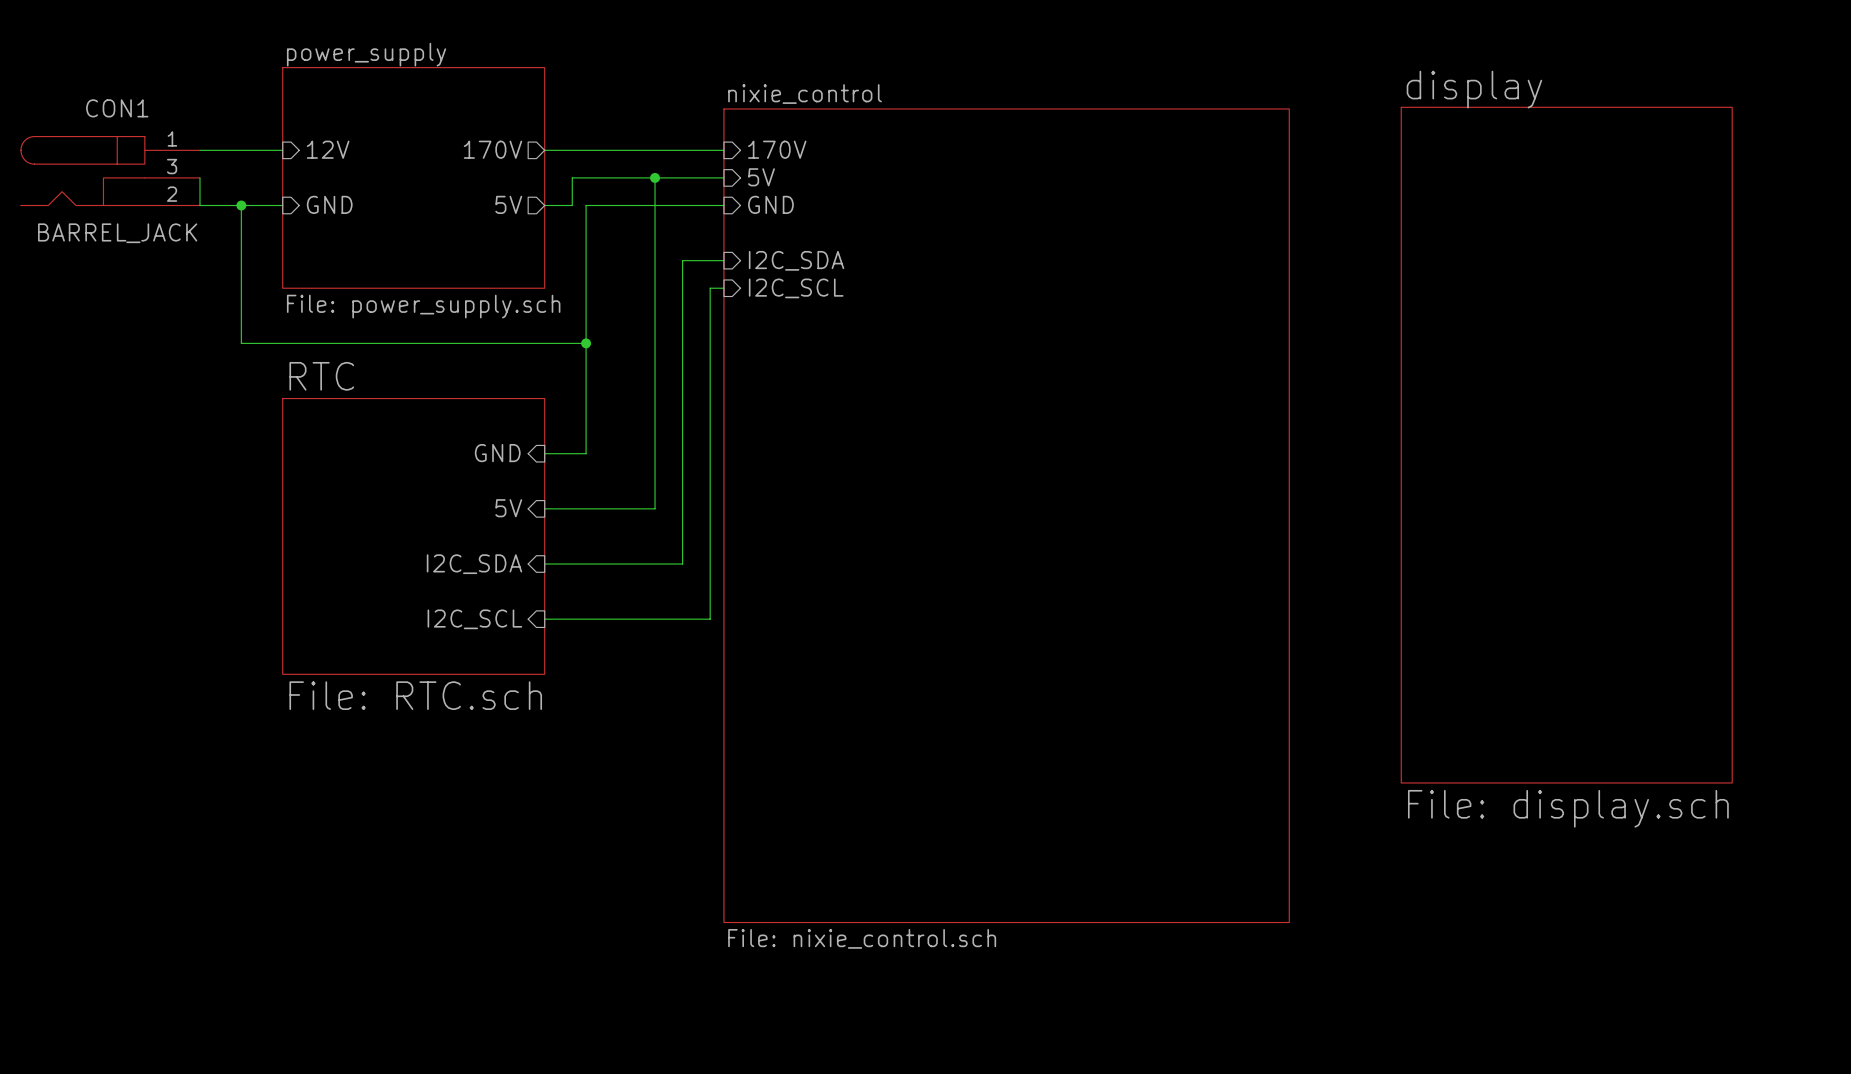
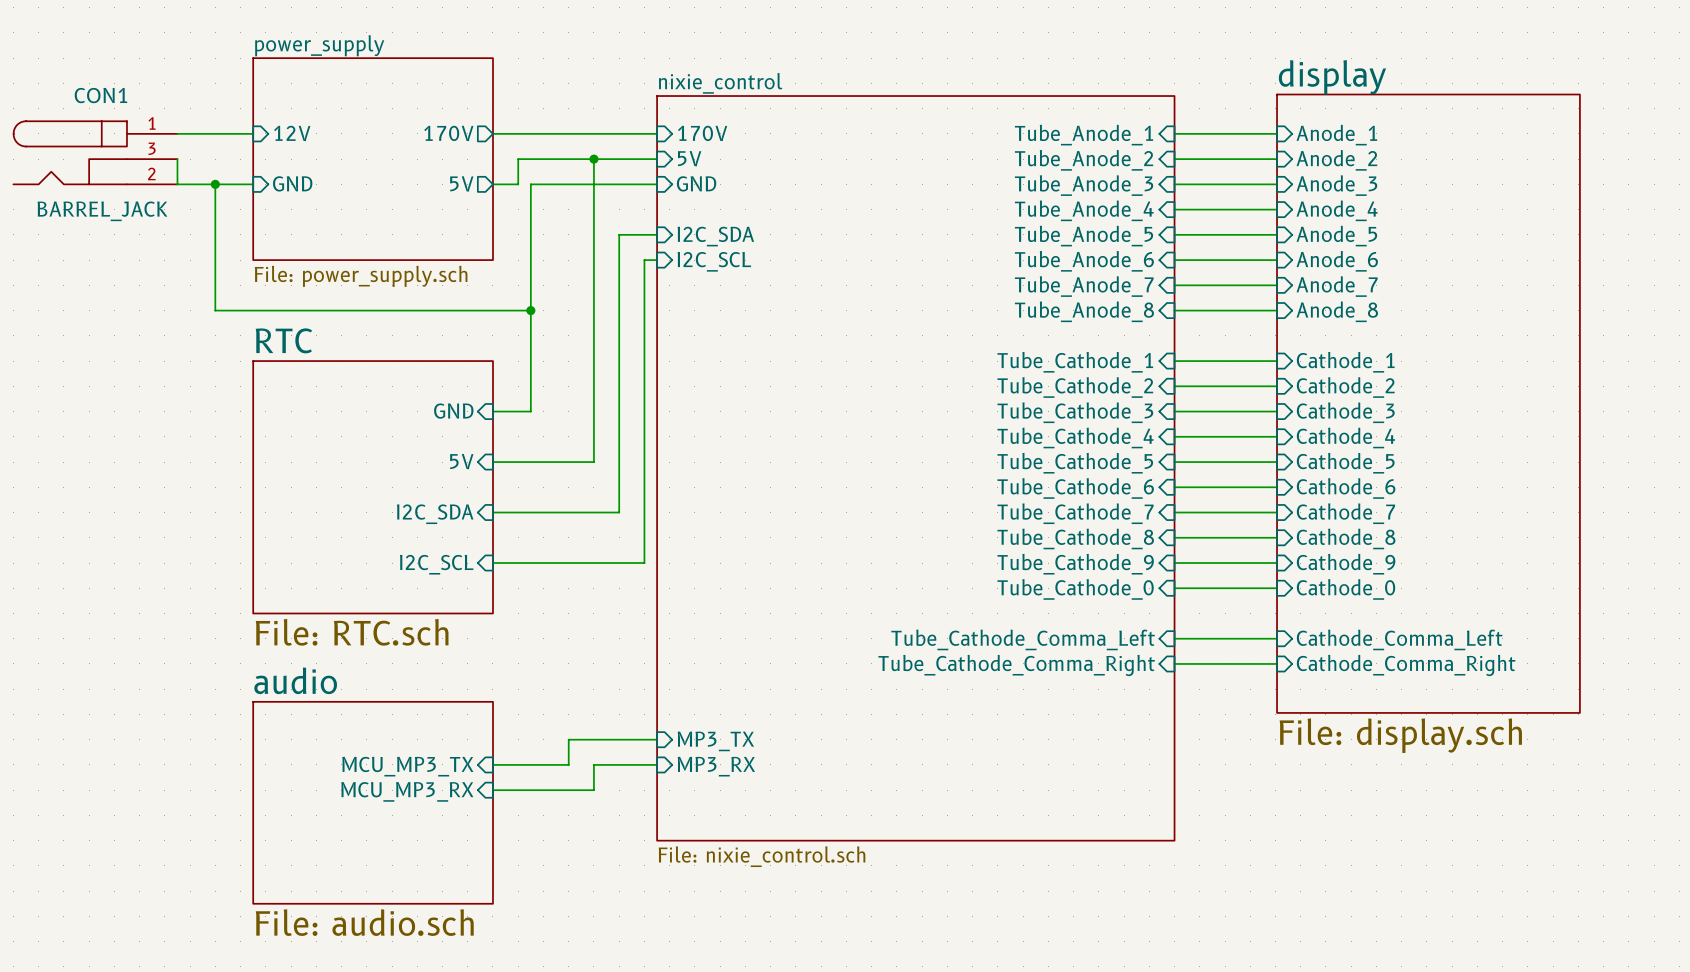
sheet pin: none -> Tube_Anode_1 (1084, 135)
wire: none -> (1174, 133) (1275, 133)
sheet pin: none -> Anode_1 (1336, 135)
wire: none -> (1174, 159) (1275, 159)
sheet pin: none -> Tube_Anode_2 (1084, 160)
sheet pin: none -> Anode_2 (1336, 160)
sheet pin: none -> Tube_Anode_3 (1084, 185)
wire: none -> (1174, 184) (1275, 184)
sheet pin: none -> Anode_3 (1336, 185)
sheet pin: none -> Tube_Anode_4 (1084, 210)
sheet pin: none -> Anode_4 (1337, 210)
wire: none -> (1174, 209) (1275, 209)
sheet pin: none -> Tube_Anode_5 (1084, 236)
wire: none -> (1174, 234) (1275, 234)
sheet pin: none -> Anode_5 (1336, 236)
sheet pin: none -> Tube_Anode_6 (1084, 261)
wire: none -> (1174, 260) (1275, 260)
sheet pin: none -> Anode_6 (1337, 261)
sheet pin: none -> Tube_Anode_7 (1084, 286)
wire: none -> (1174, 285) (1275, 285)
sheet pin: none -> Anode_7 (1337, 286)
sheet pin: none -> Tube_Anode_8 (1084, 311)
wire: none -> (1174, 310) (1275, 310)
sheet pin: none -> Anode_8 (1337, 311)
sheet pin: none -> Tube_Cathode_1 (1075, 362)
wire: none -> (1174, 361) (1275, 361)
sheet pin: none -> Cathode_1 (1345, 362)
sheet pin: none -> Tube_Cathode_2 (1075, 387)
wire: none -> (1174, 386) (1275, 386)
sheet pin: none -> Cathode_2 (1345, 387)
sheet pin: none -> Tube_Cathode_3 (1075, 412)
wire: none -> (1174, 411) (1275, 411)
sheet pin: none -> Cathode_3 (1345, 412)
sheet pin: none -> Tube_Cathode_4 (1075, 437)
wire: none -> (1174, 436) (1275, 436)
sheet pin: none -> Cathode_4 (1345, 437)
wire: none -> (1174, 462) (1275, 462)
sheet pin: none -> Tube_Cathode_5 (1075, 463)
sheet pin: none -> Cathode_5 (1345, 463)
sheet pin: none -> Tube_Cathode_6 (1075, 488)
wire: none -> (1174, 487) (1275, 487)
sheet pin: none -> Cathode_6 (1346, 488)
sheet pin: none -> Tube_Cathode_7 (1075, 513)
wire: none -> (1174, 512) (1275, 512)
sheet pin: none -> Cathode_7 (1345, 513)
sheet pin: none -> Tube_Cathode_8 (1075, 538)
wire: none -> (1174, 537) (1275, 537)
sheet pin: none -> Cathode_8 (1346, 538)
sheet pin: none -> Tube_Cathode_9 (1075, 564)
wire: none -> (1174, 563) (1275, 563)
sheet pin: none -> Cathode_9 (1346, 564)
sheet pin: none -> Tube_Cathode_0 (1075, 589)
wire: none -> (1174, 588) (1275, 588)
sheet pin: none -> Cathode_0 (1346, 589)
wire: none -> (1174, 638) (1275, 638)
sheet pin: none -> Tube_Cathode_Comma_Left (1023, 639)
sheet pin: none -> Cathode_Comma_Left (1399, 639)
wire: none -> (1174, 663) (1275, 663)
sheet pin: none -> Tube_Cathode_Comma_Right (1016, 665)
sheet pin: none -> Cathode_Comma_Right (1406, 665)
wire: none -> (657, 739) (568, 739) (568, 764) (492, 764)
sheet pin: none -> MP3_TX (715, 741)
sheet pin: none -> MCU_MP3_TX (407, 766)
wire: none -> (657, 764) (593, 764) (593, 790) (492, 790)
sheet pin: none -> MP3_RX (716, 766)
sheet pin: none -> MCU_MP3_RX (407, 791)
sheet audio: none -> File: audio.sch (373, 802)

